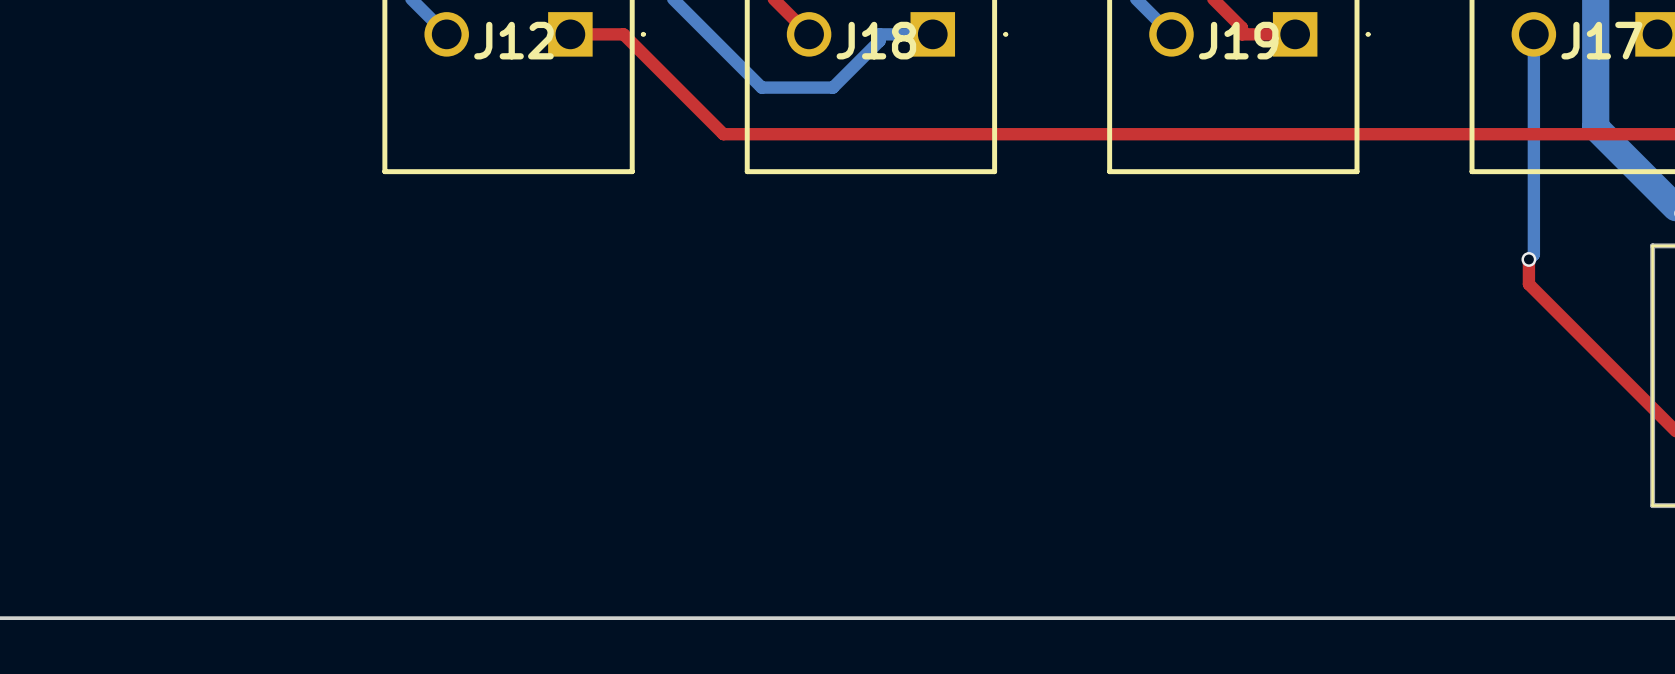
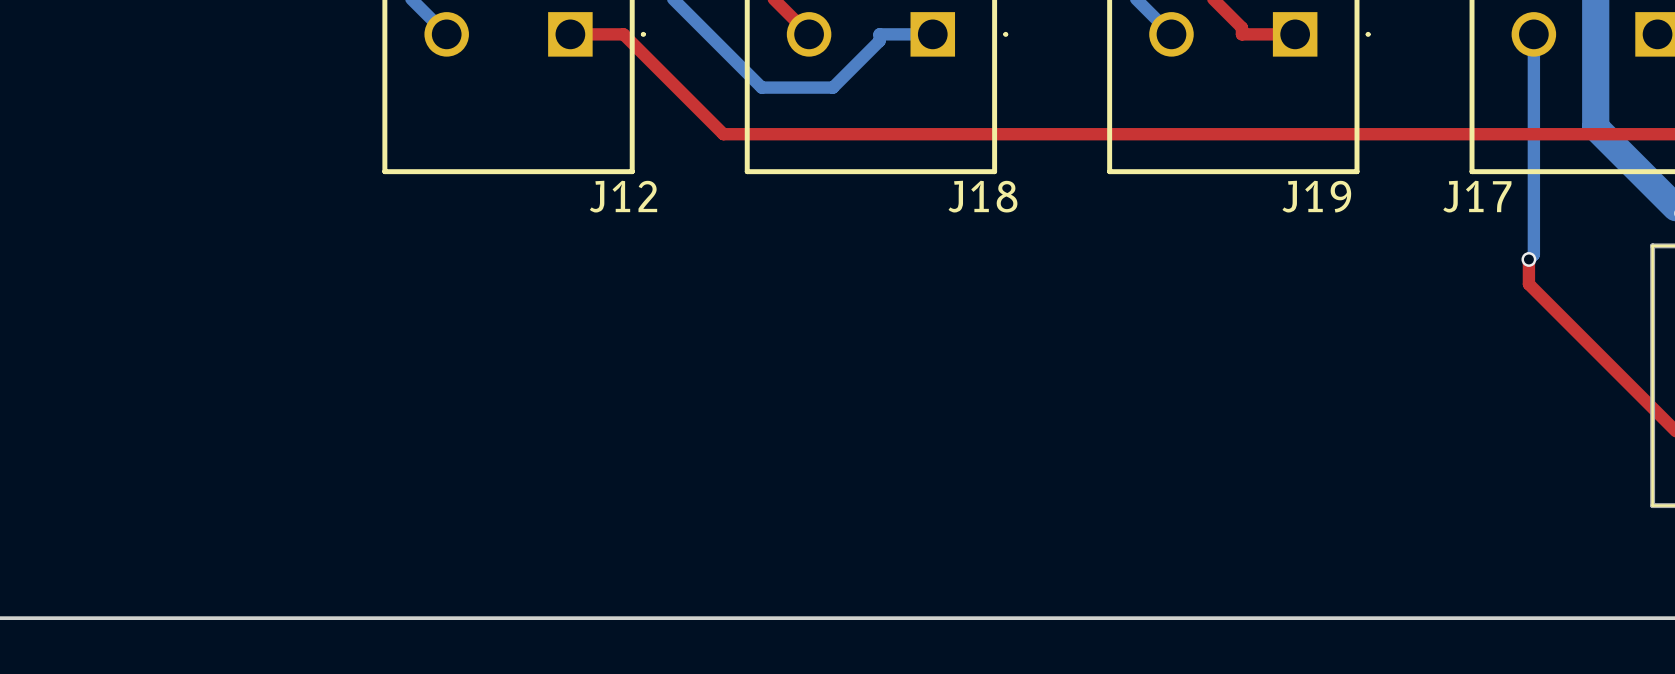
J12 name position: J12 (513, 40) -> J12 (623, 196)
J18 name position: J18 (876, 40) -> J18 (982, 196)
J19 name position: J19 (1238, 40) -> J19 (1316, 196)
J17 name position: J17 (1601, 40) -> J17 (1477, 196)

